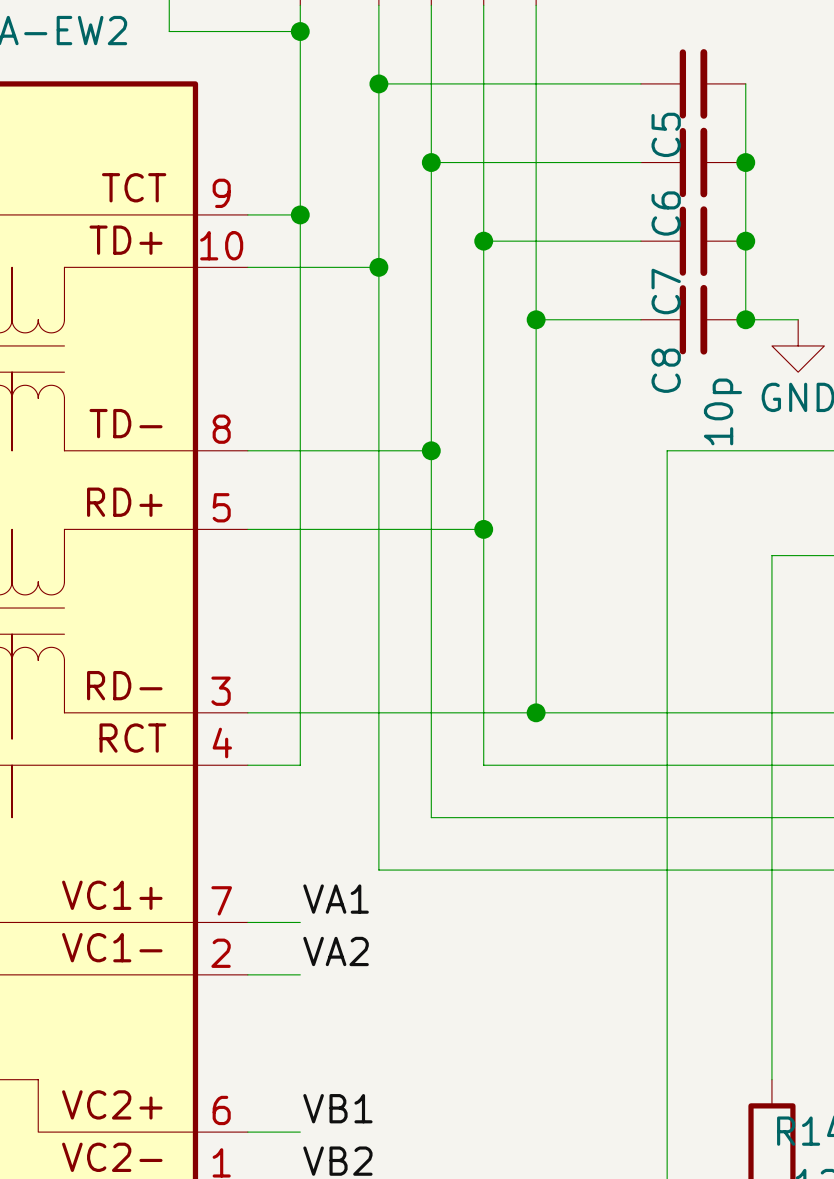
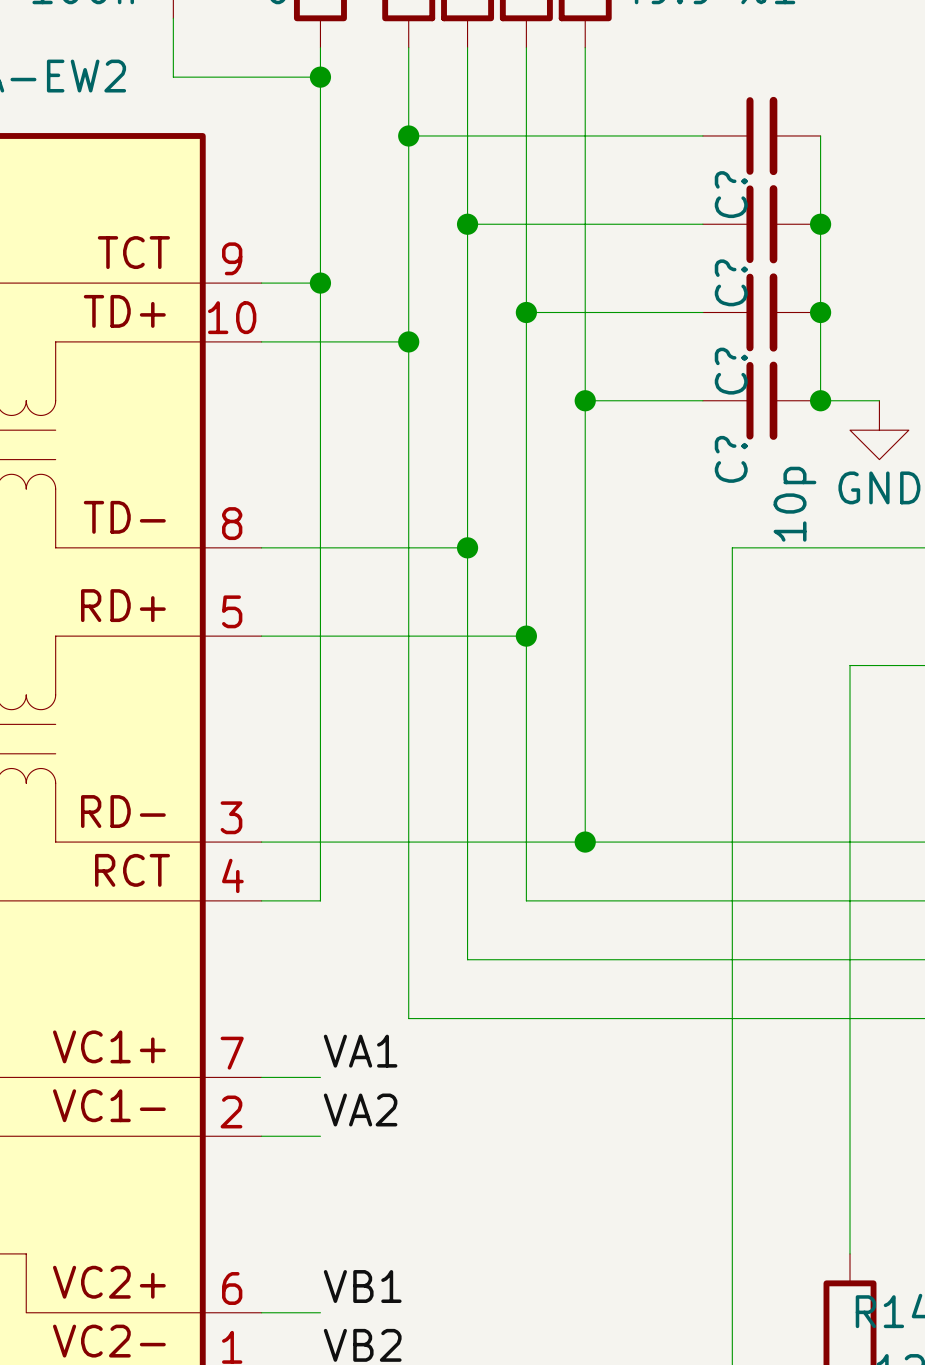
C5 name: C5 (666, 134) -> C? (731, 194)
C6 name: C6 (666, 213) -> C? (731, 282)
C7 name: C7 (666, 291) -> C? (731, 371)
C8 name: C8 (666, 370) -> C? (731, 459)

